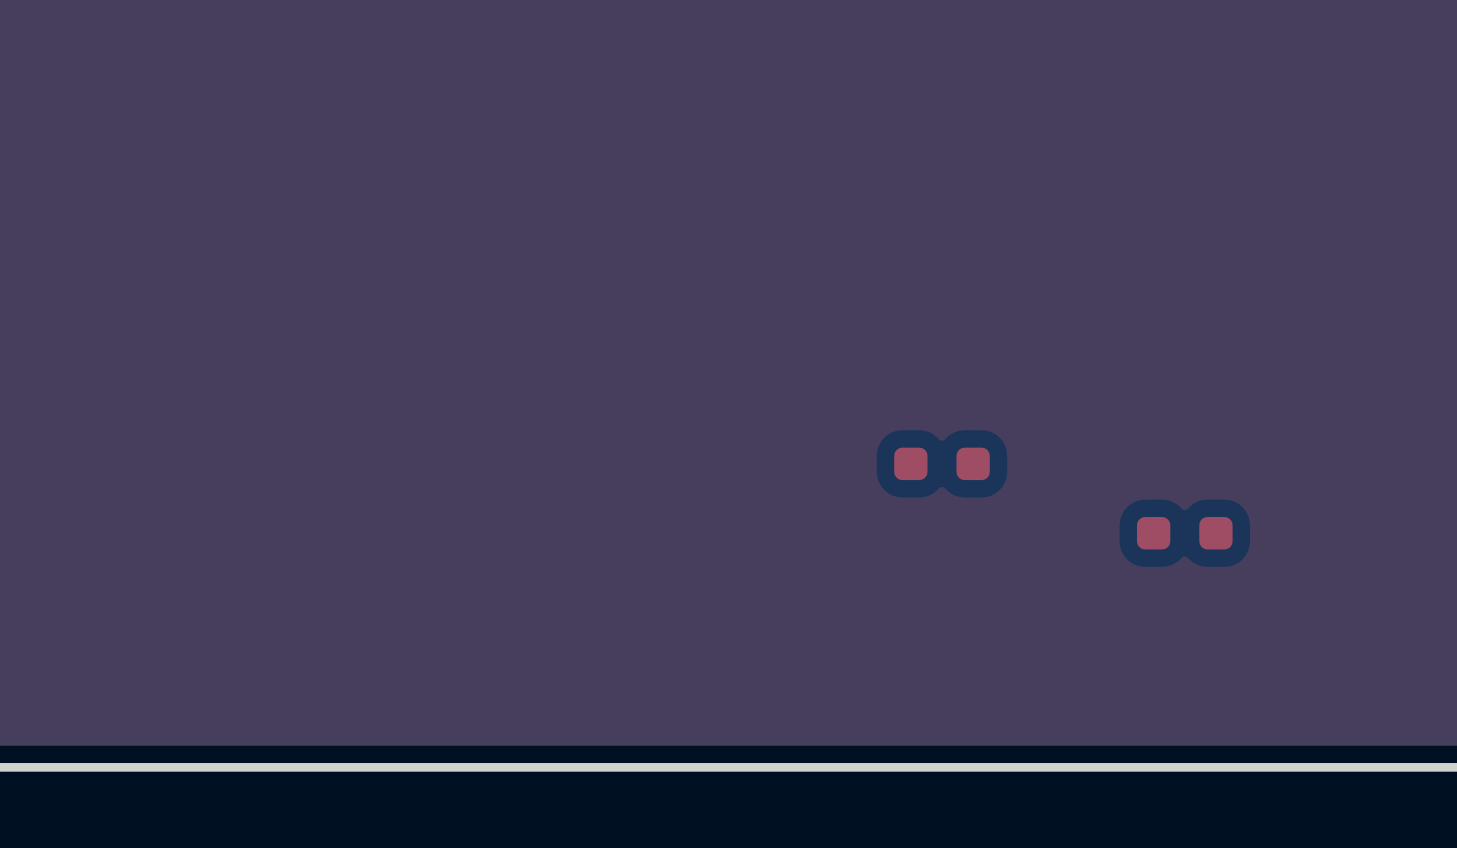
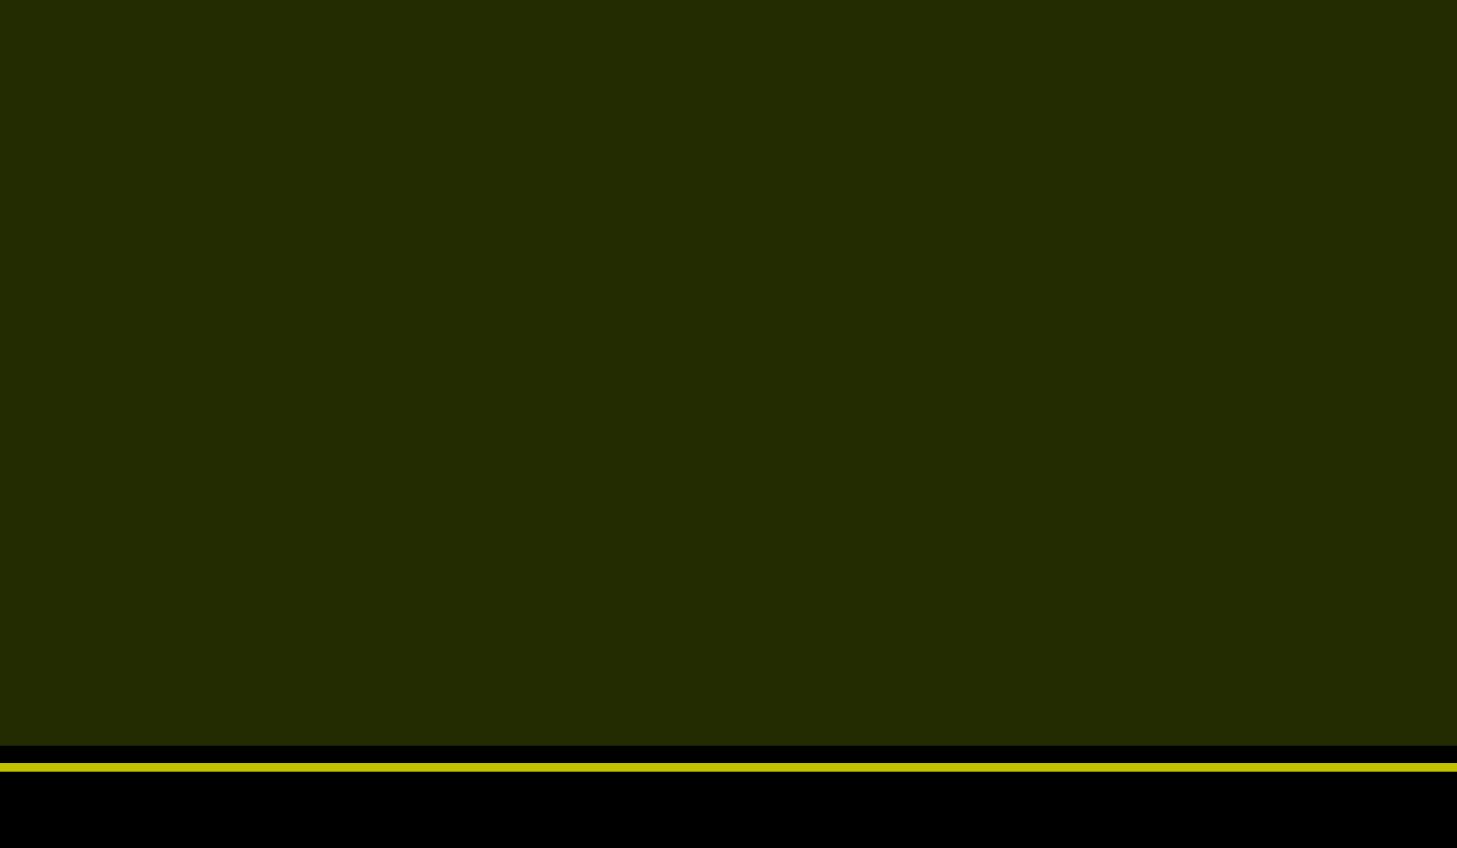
part: (941, 463) -> none
part: (1184, 533) -> none

